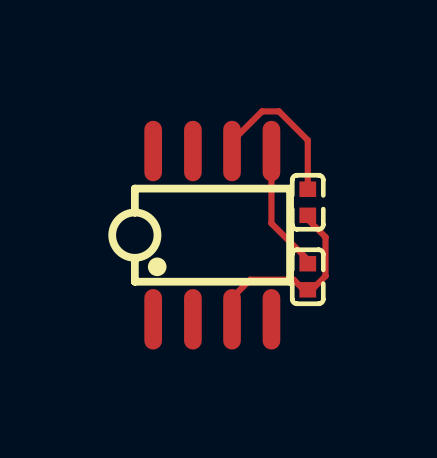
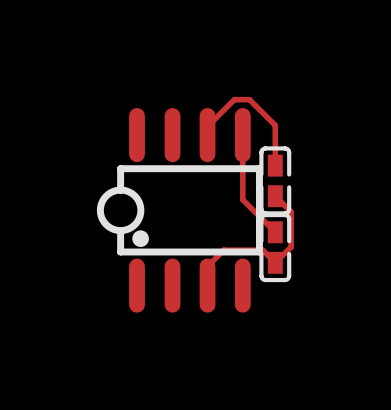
part footprint: [289, 172, 326, 232] -> [259, 146, 292, 216]
part footprint: [289, 247, 326, 307] -> [259, 212, 292, 283]

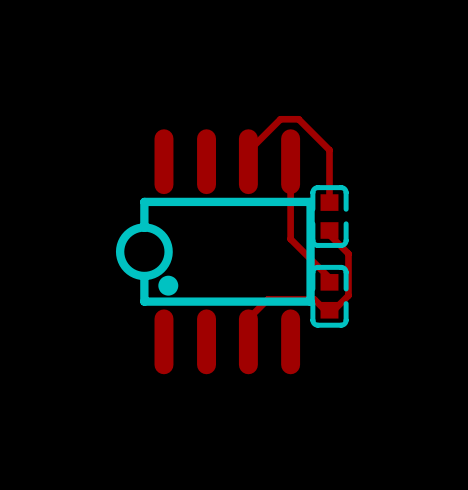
part footprint: [259, 146, 292, 216] -> [310, 185, 349, 248]
part footprint: [259, 212, 292, 283] -> [310, 264, 349, 328]

